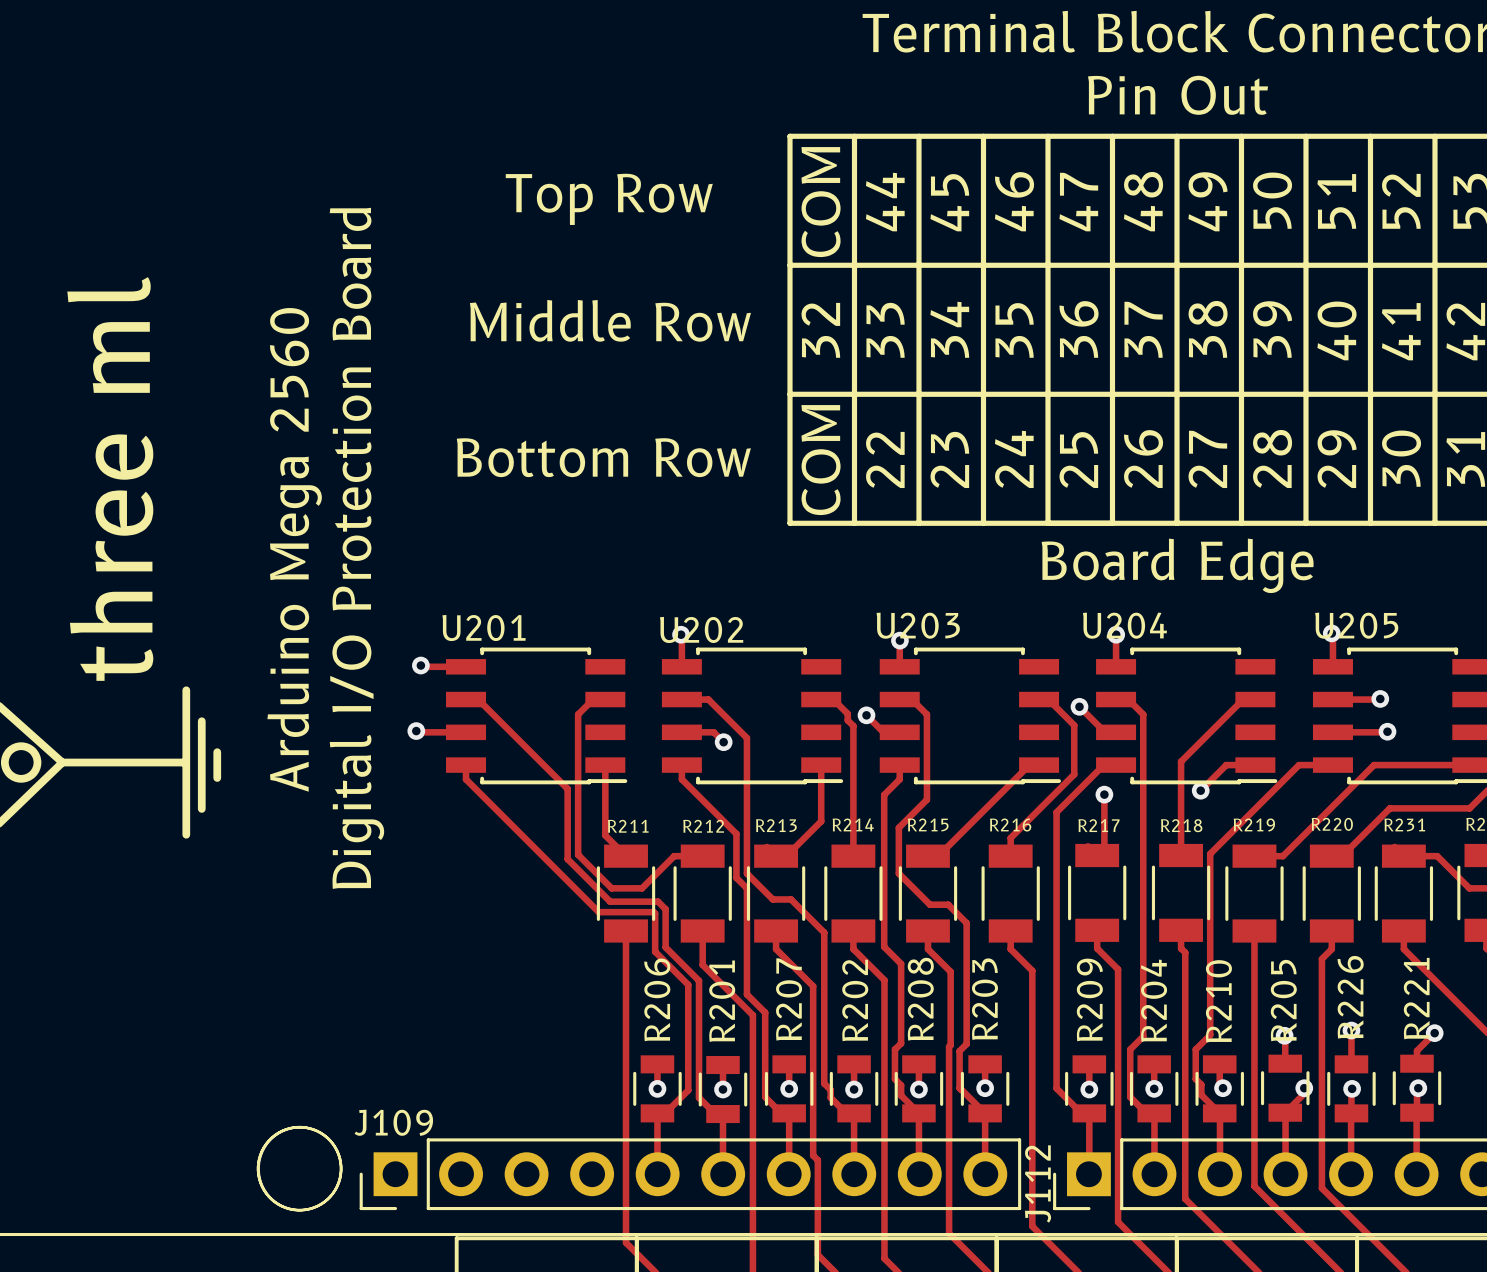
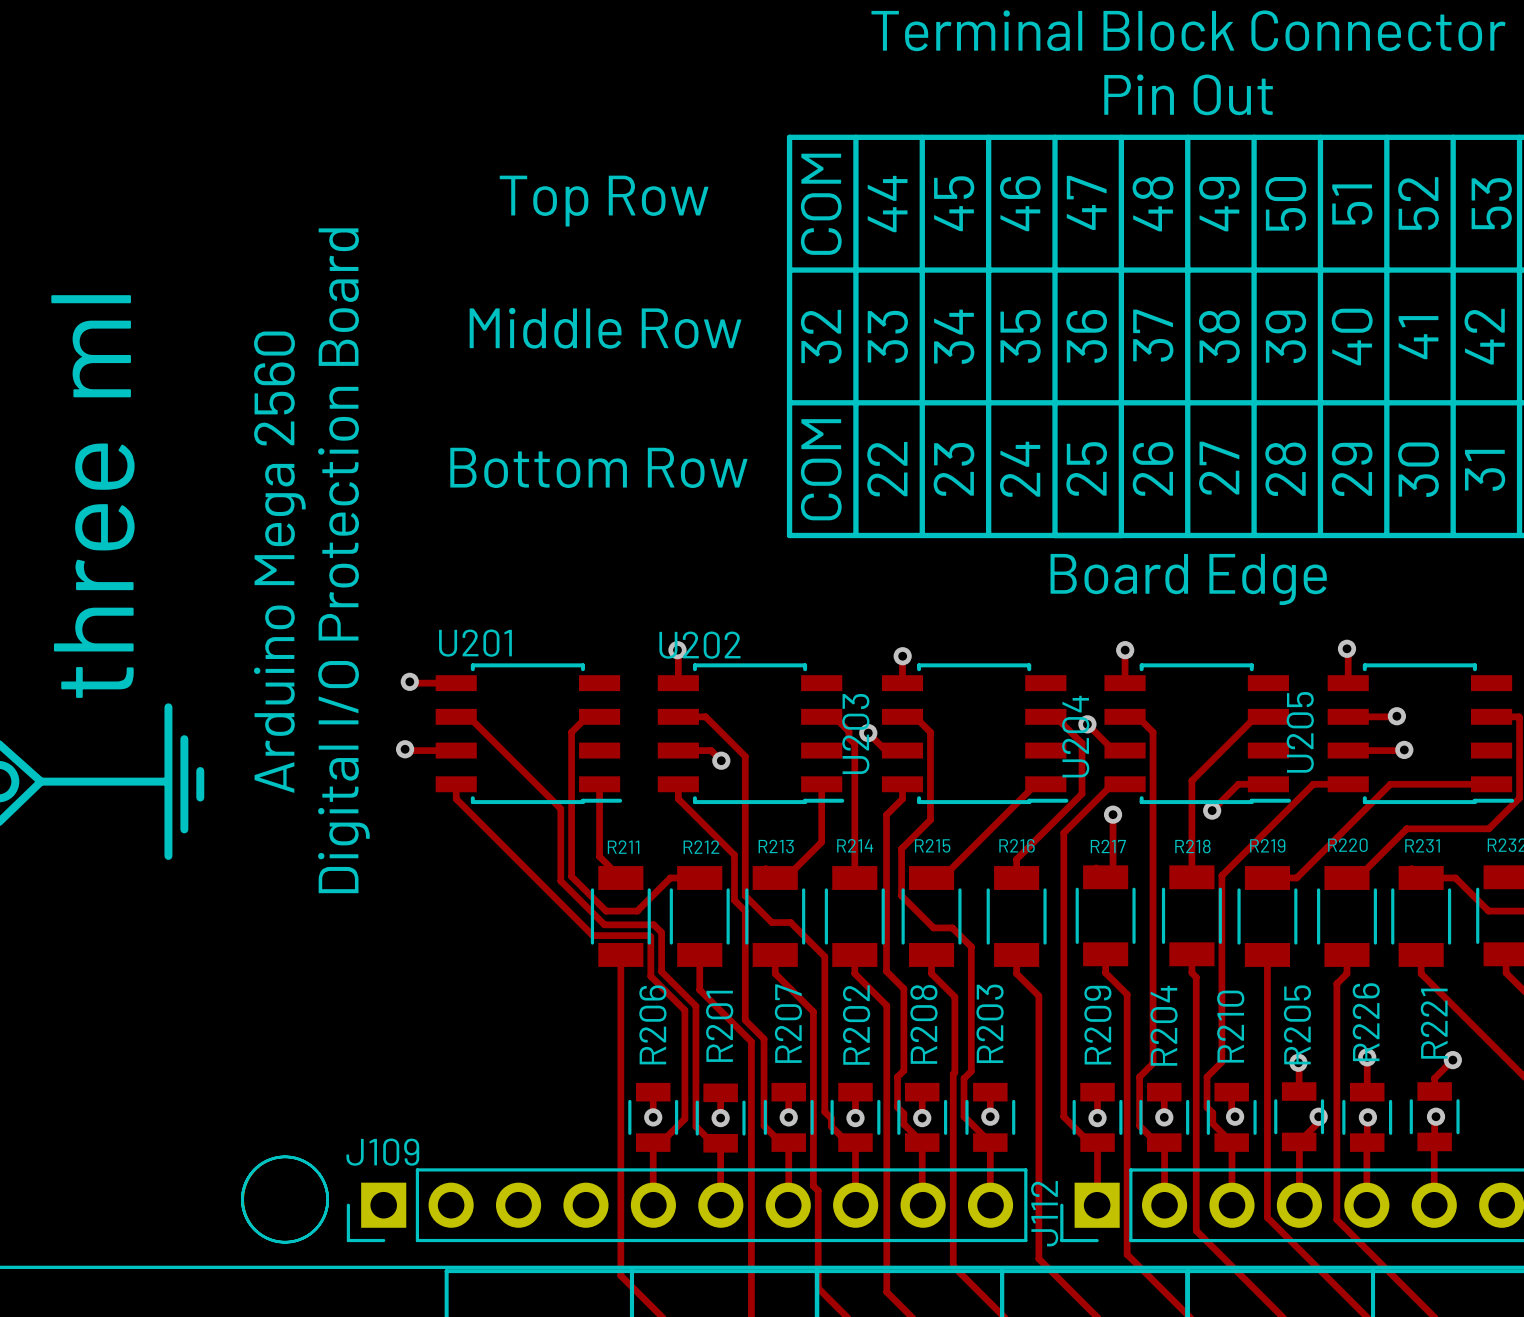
U203 name rotation: 0° (918, 625) -> 90° counterclockwise (855, 733)
U204 name rotation: 0° (1124, 625) -> 90° counterclockwise (1075, 736)
U205 name rotation: 0° (1356, 625) -> 90° counterclockwise (1300, 732)

